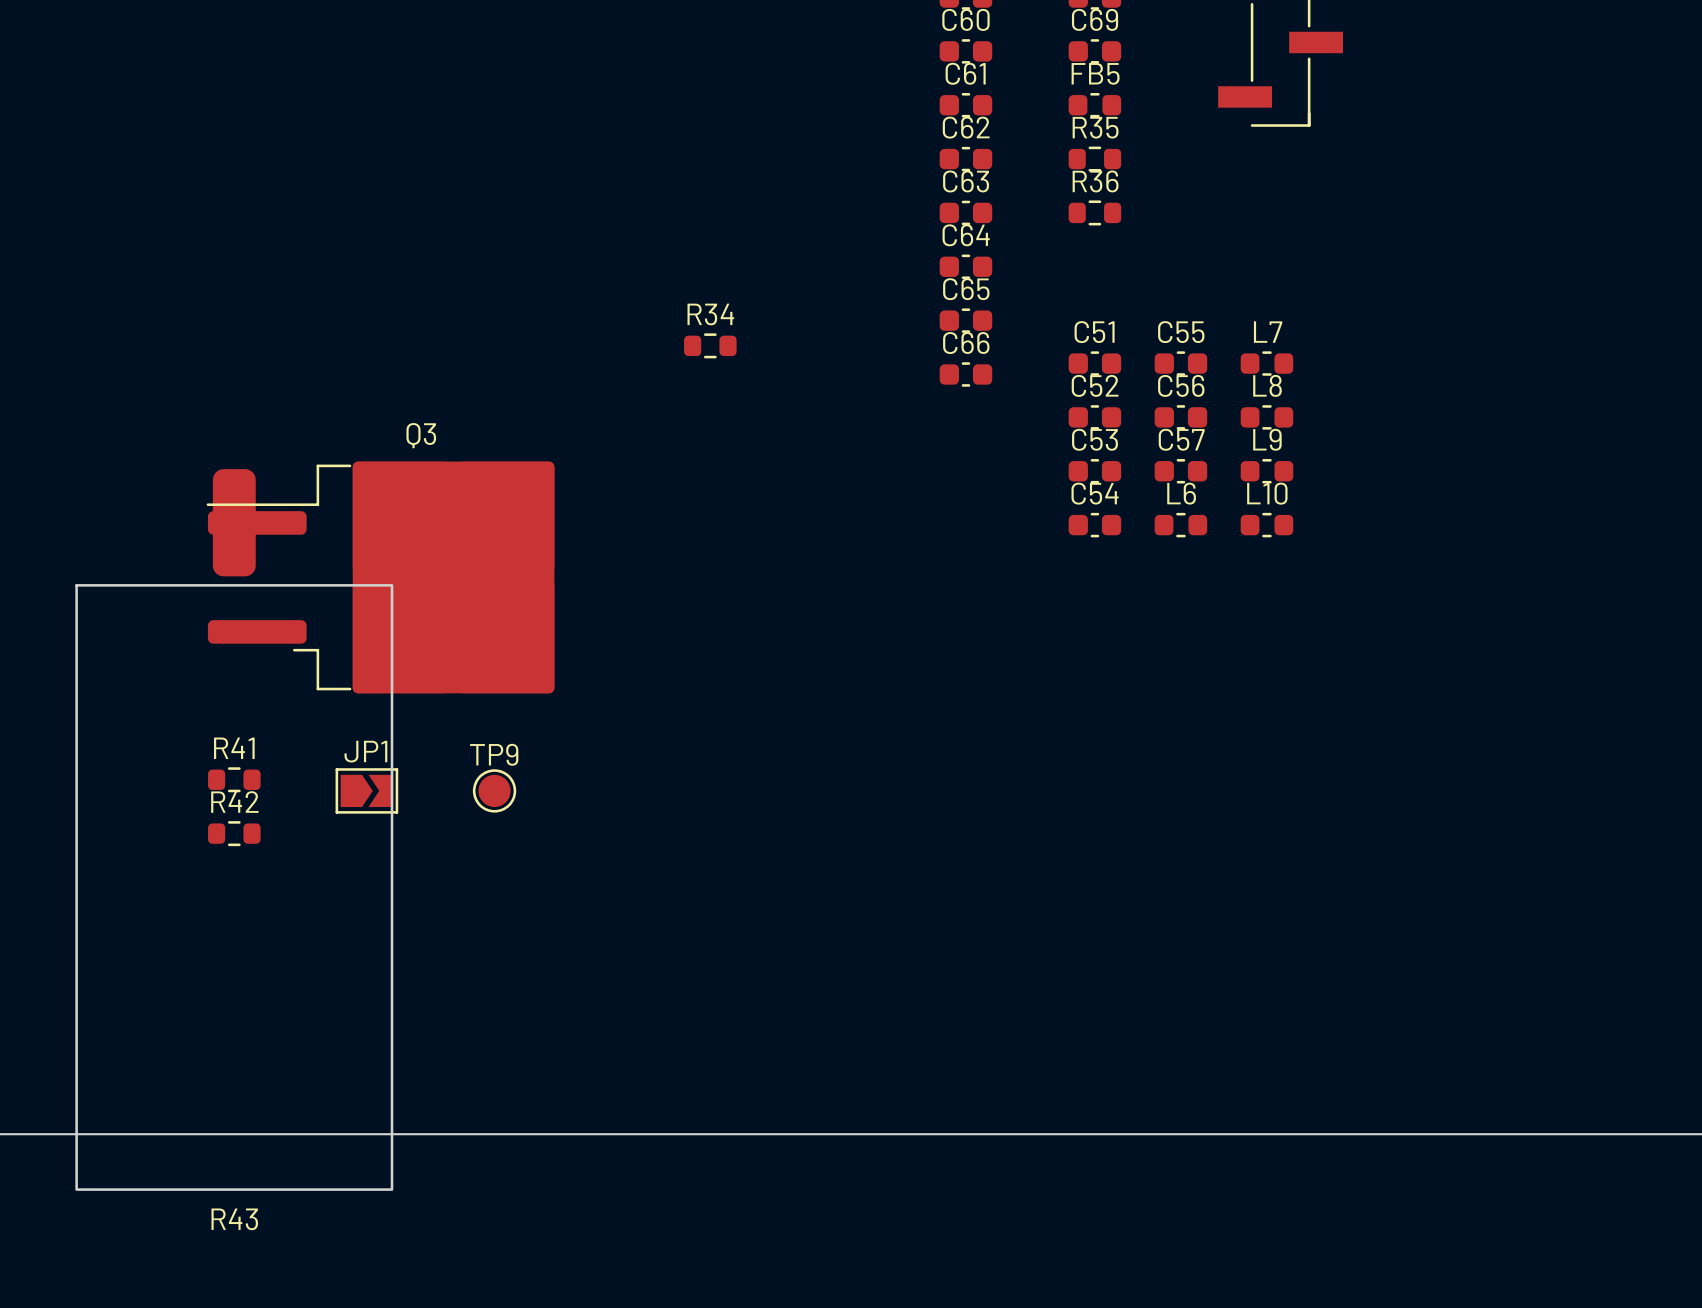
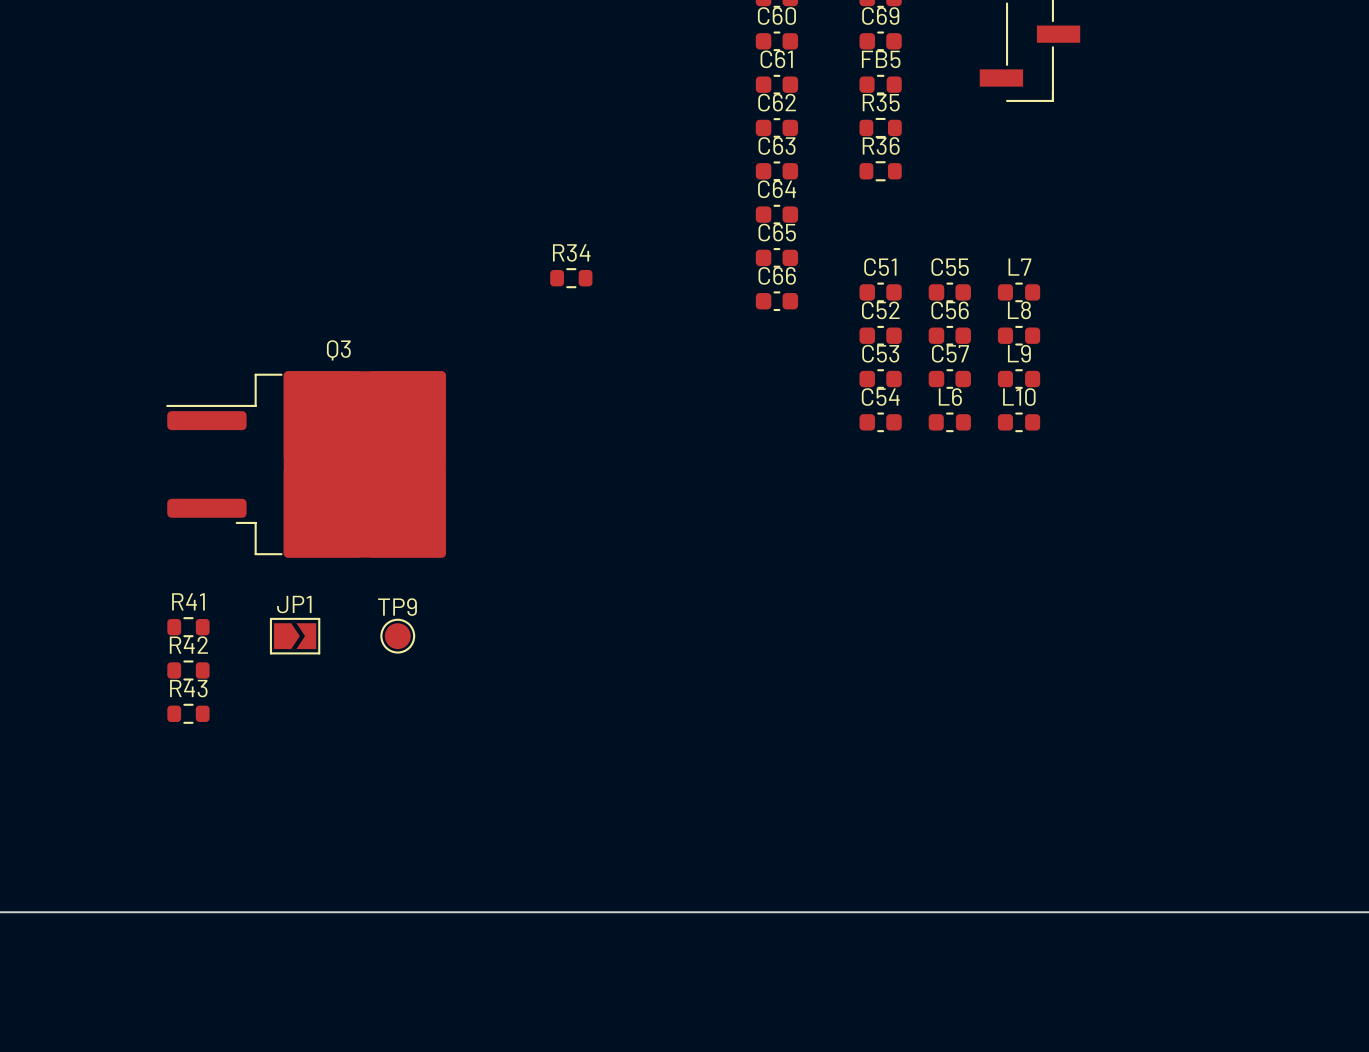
R43 footprint: [75, 469, 394, 1191] -> [167, 703, 210, 724]
R43 name position: R43 (234, 1219) -> R43 (188, 688)

